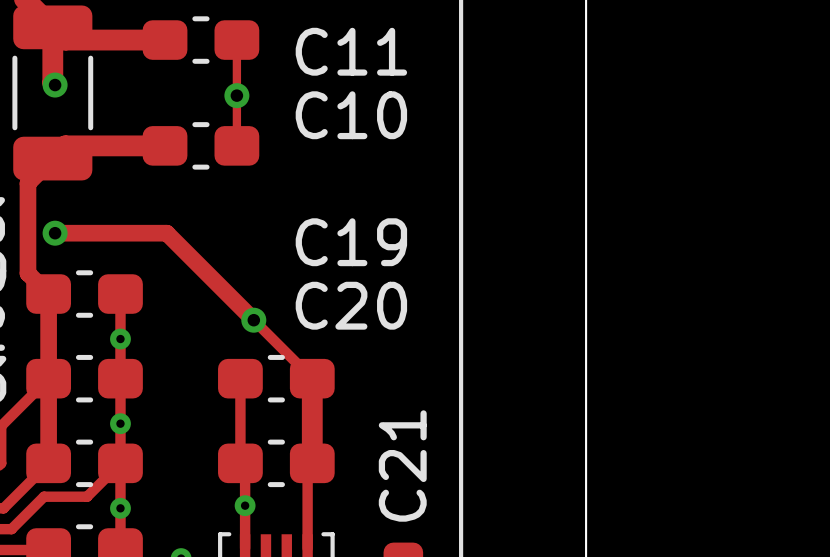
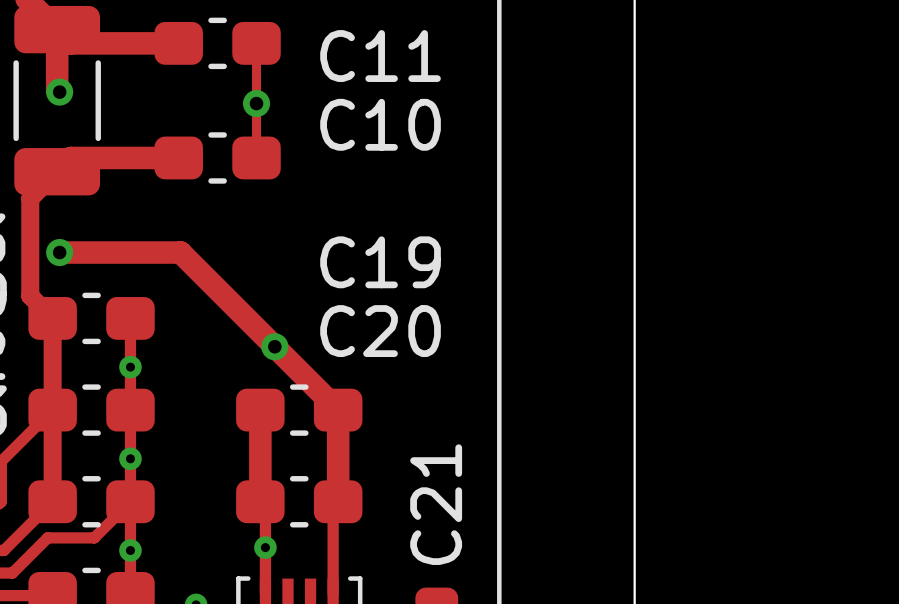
track width: thin (55, 233) (166, 233) (312, 378) -> thick (59, 252) (180, 252) (338, 410)
track width: thin (240, 378) (240, 463) -> thick (260, 410) (260, 501)

